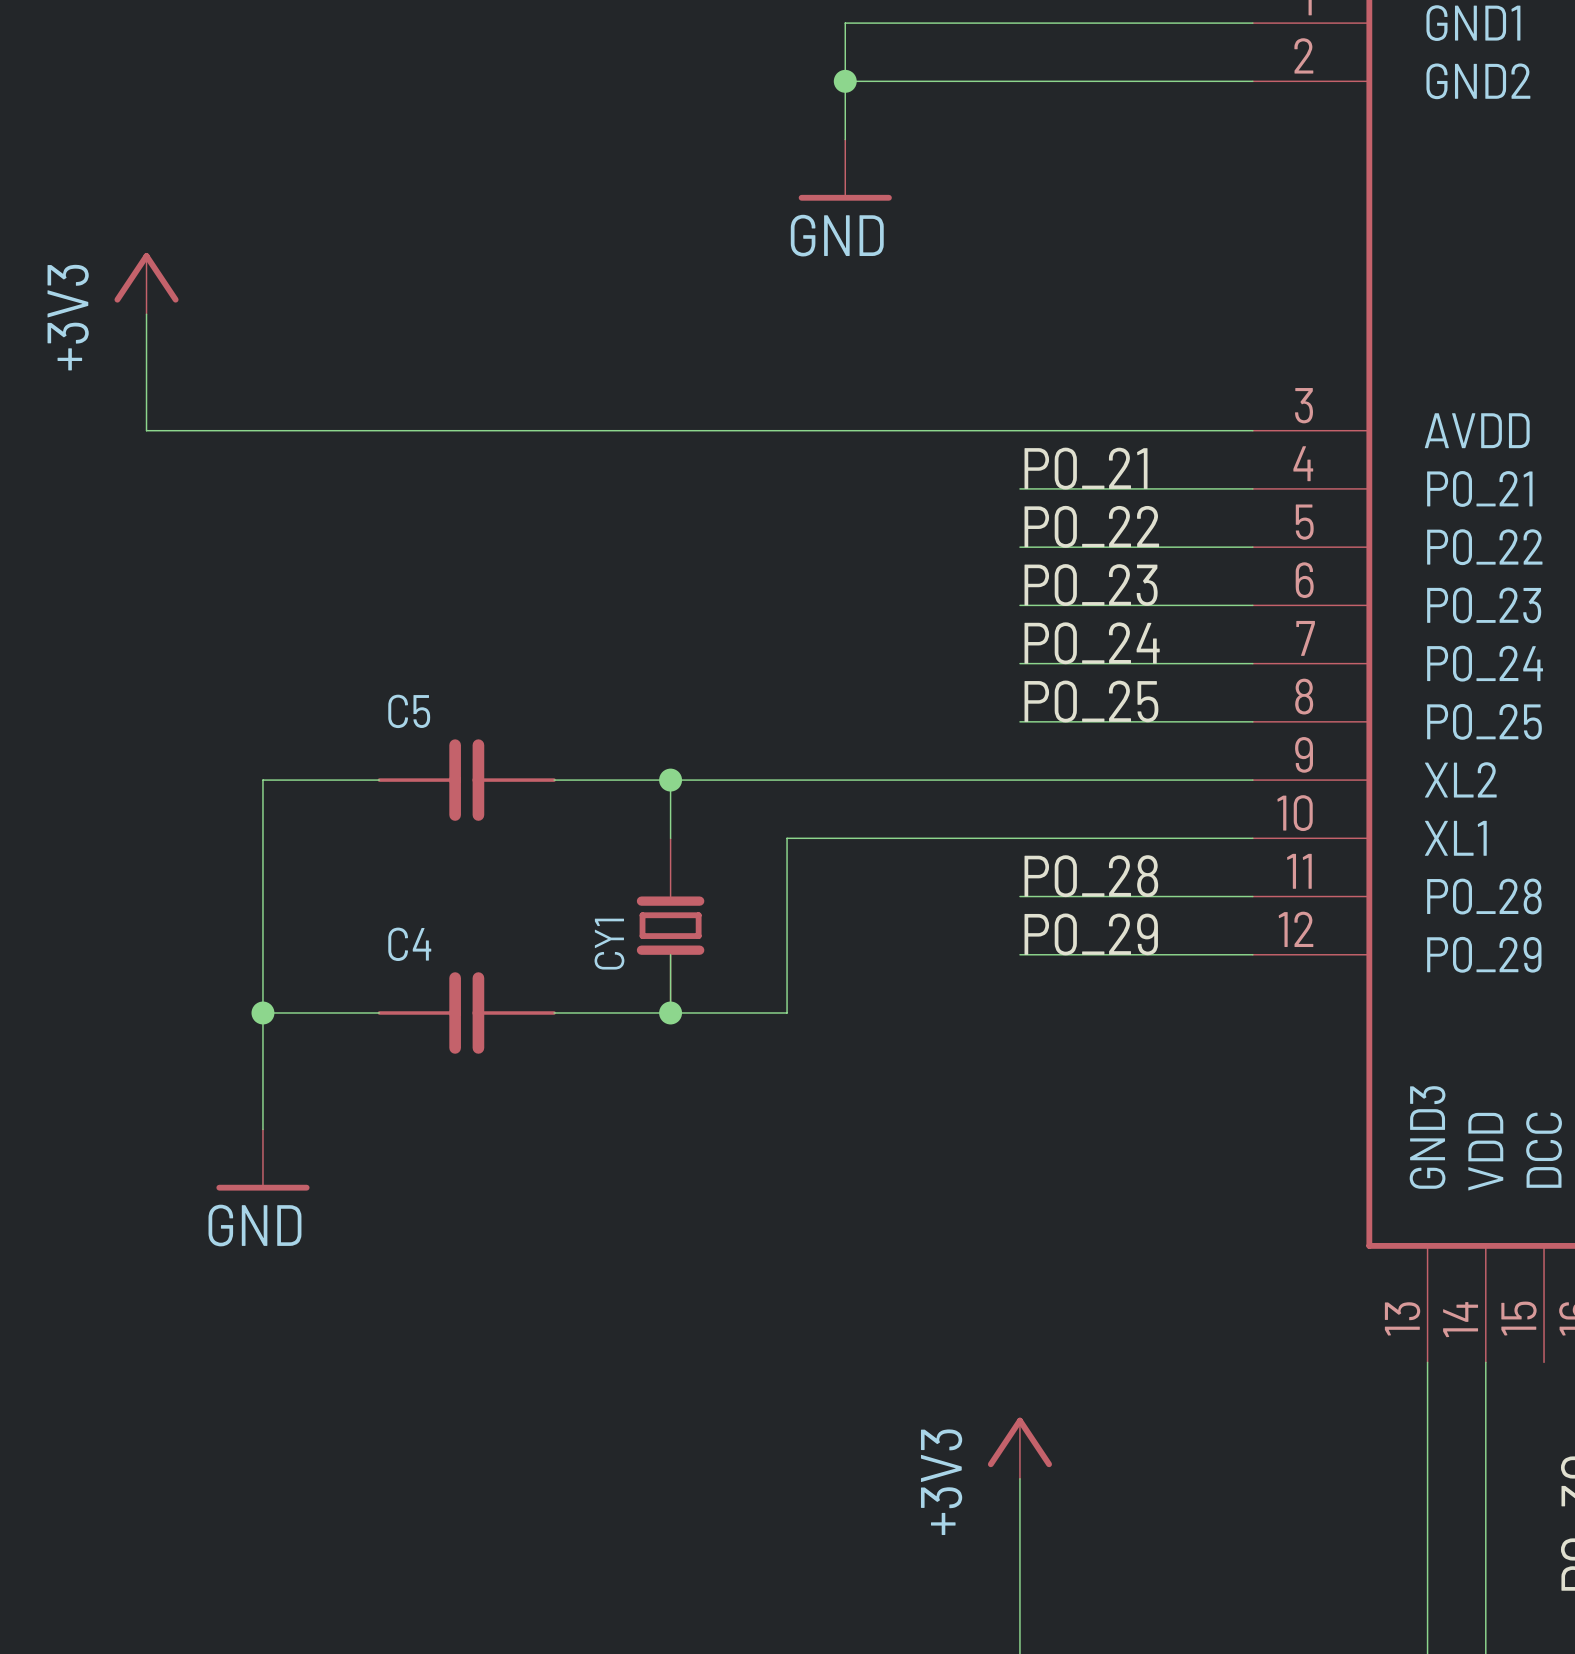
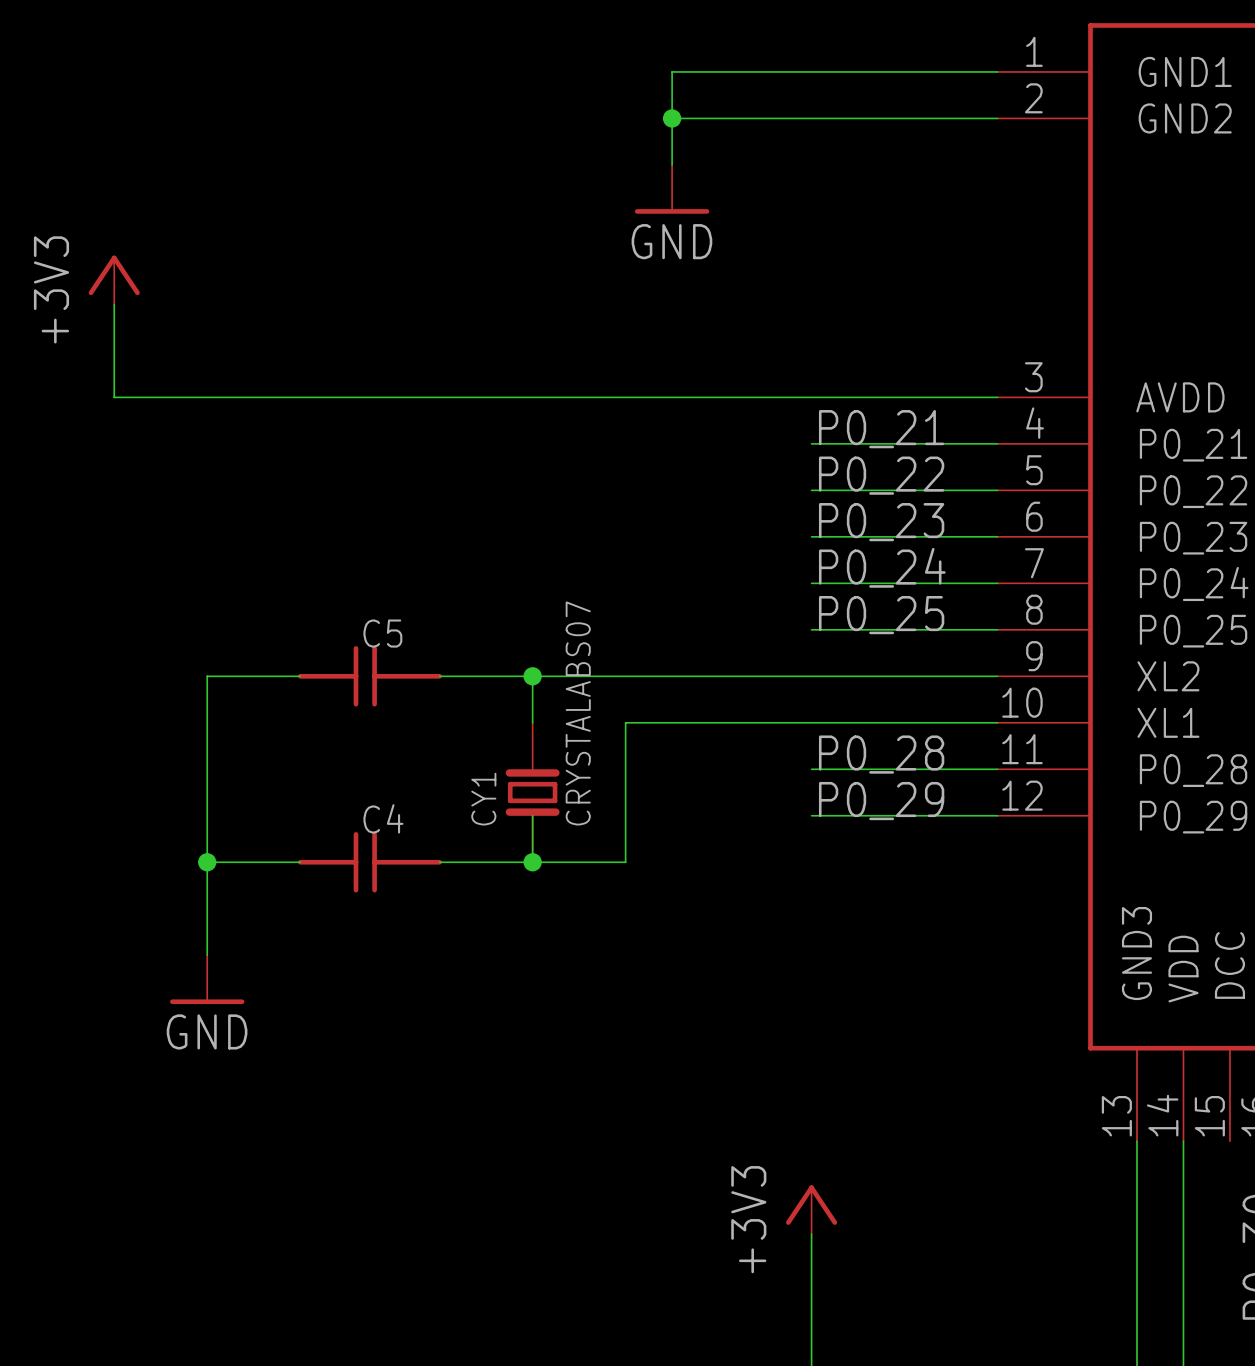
C5 name position: C5 (409, 711) -> C5 (382, 633)
C5 symbol: [377, 739, 556, 821] -> [297, 646, 442, 707]
CY1 value: none -> CRYSTALABS07 (578, 713)
C4 name position: C4 (409, 944) -> C4 (383, 818)
C4 symbol: [377, 972, 556, 1054] -> [297, 832, 442, 893]

